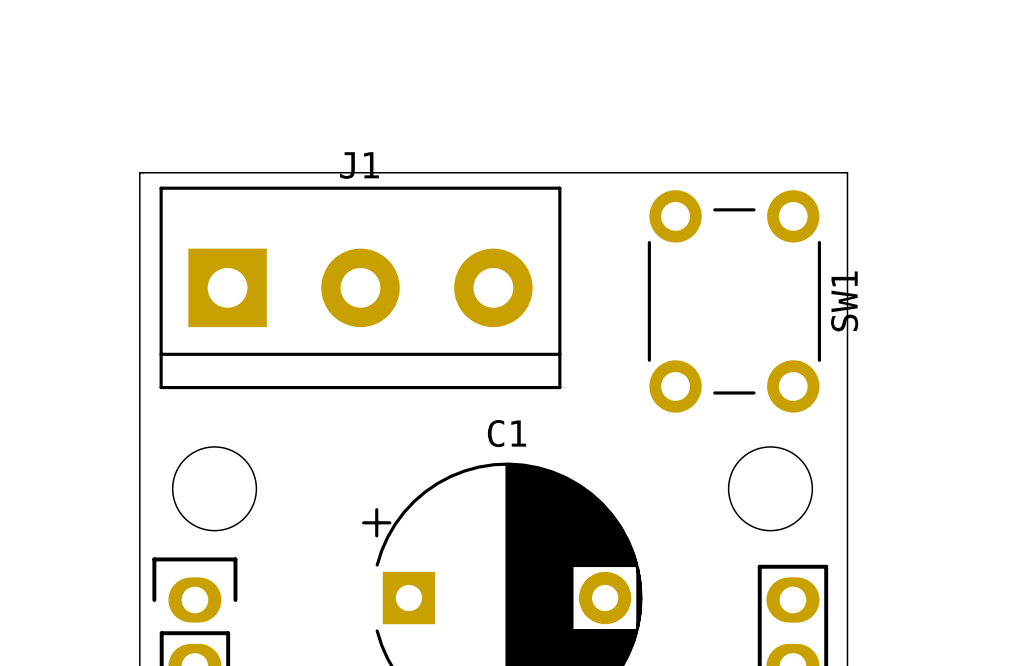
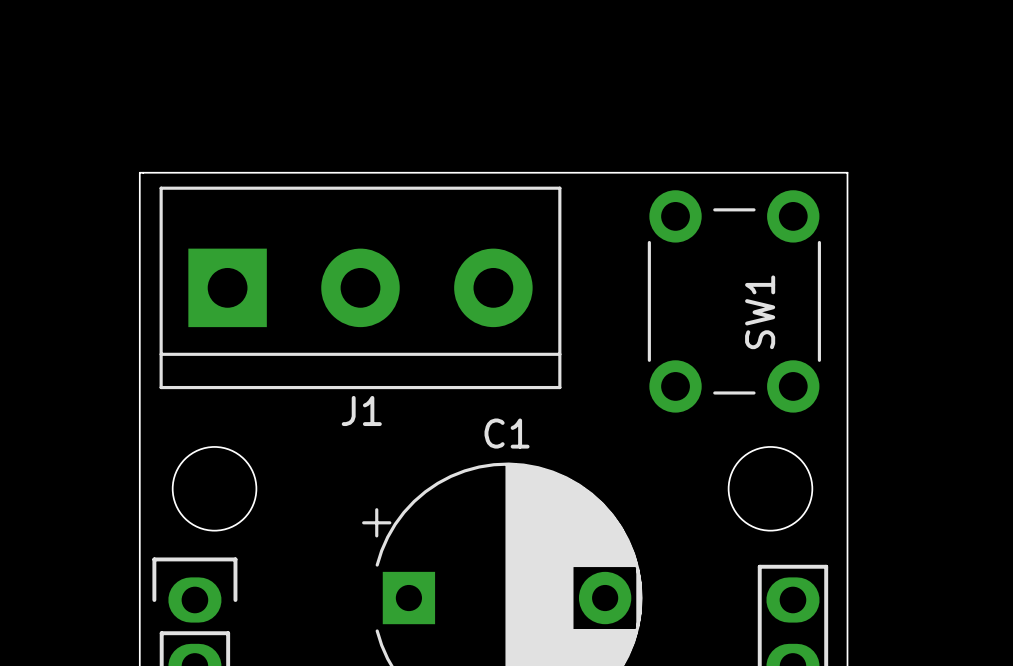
J1 name position: J1 (359, 165) -> J1 (361, 410)
SW1 name position: SW1 (844, 301) -> SW1 (760, 312)

